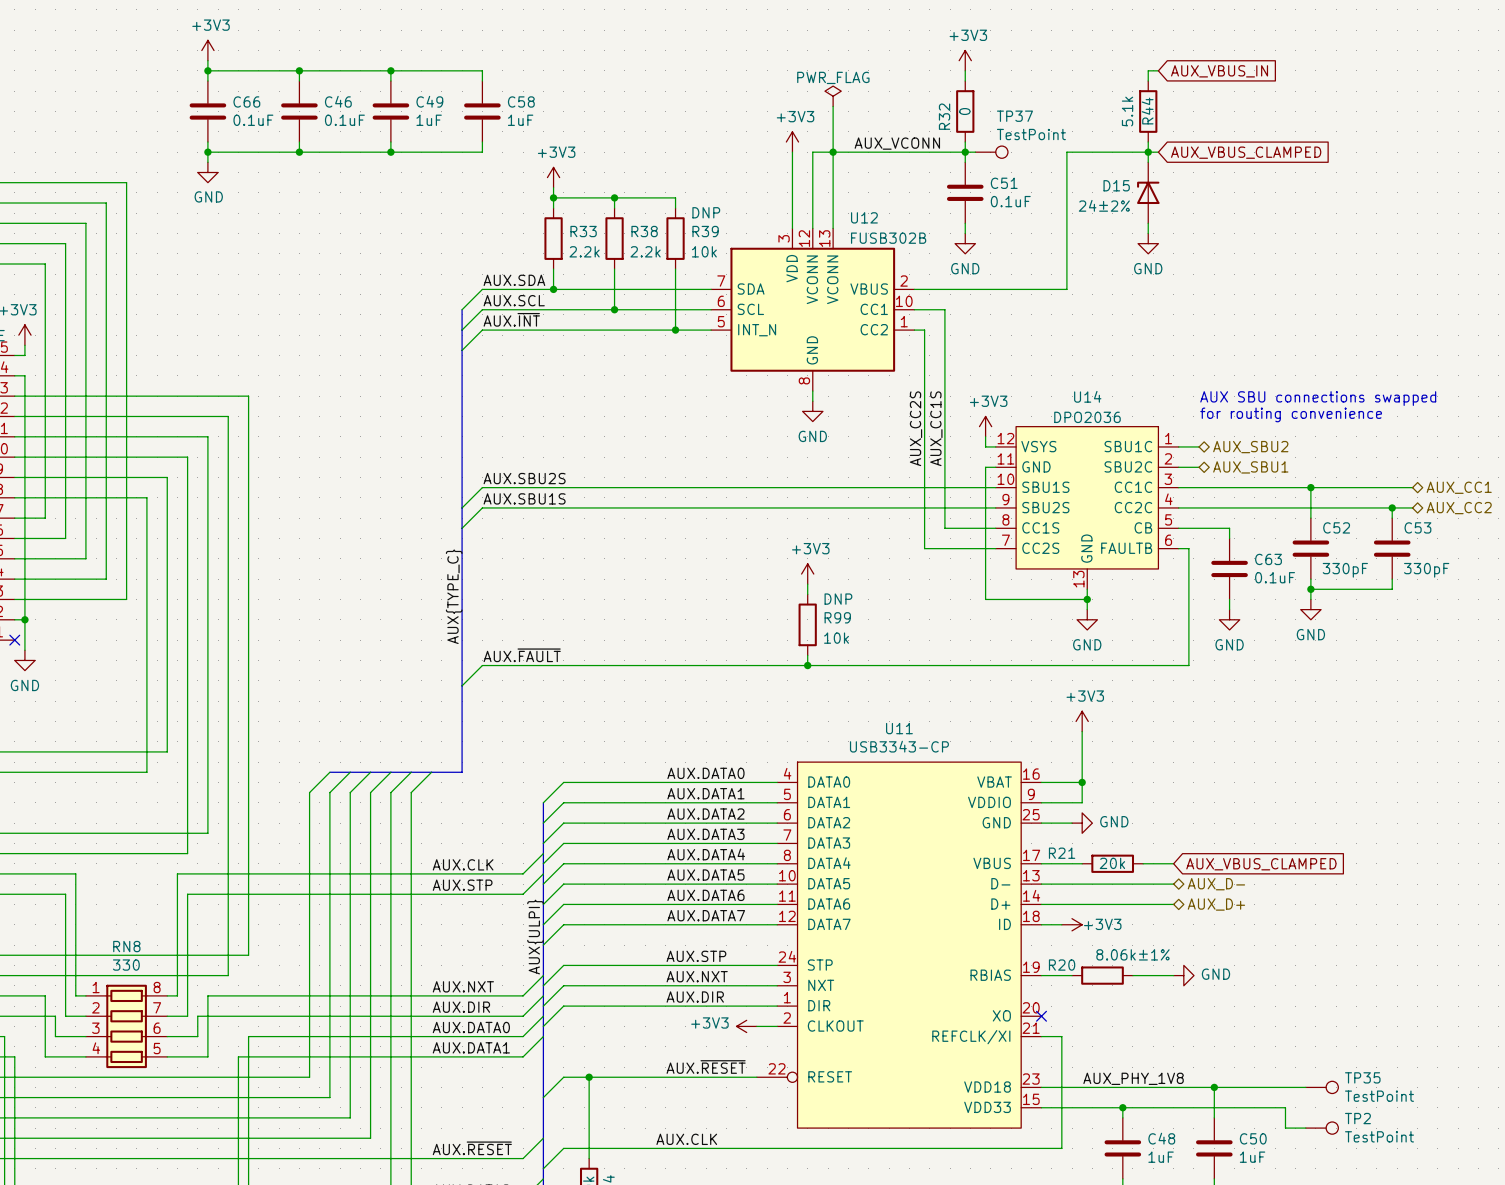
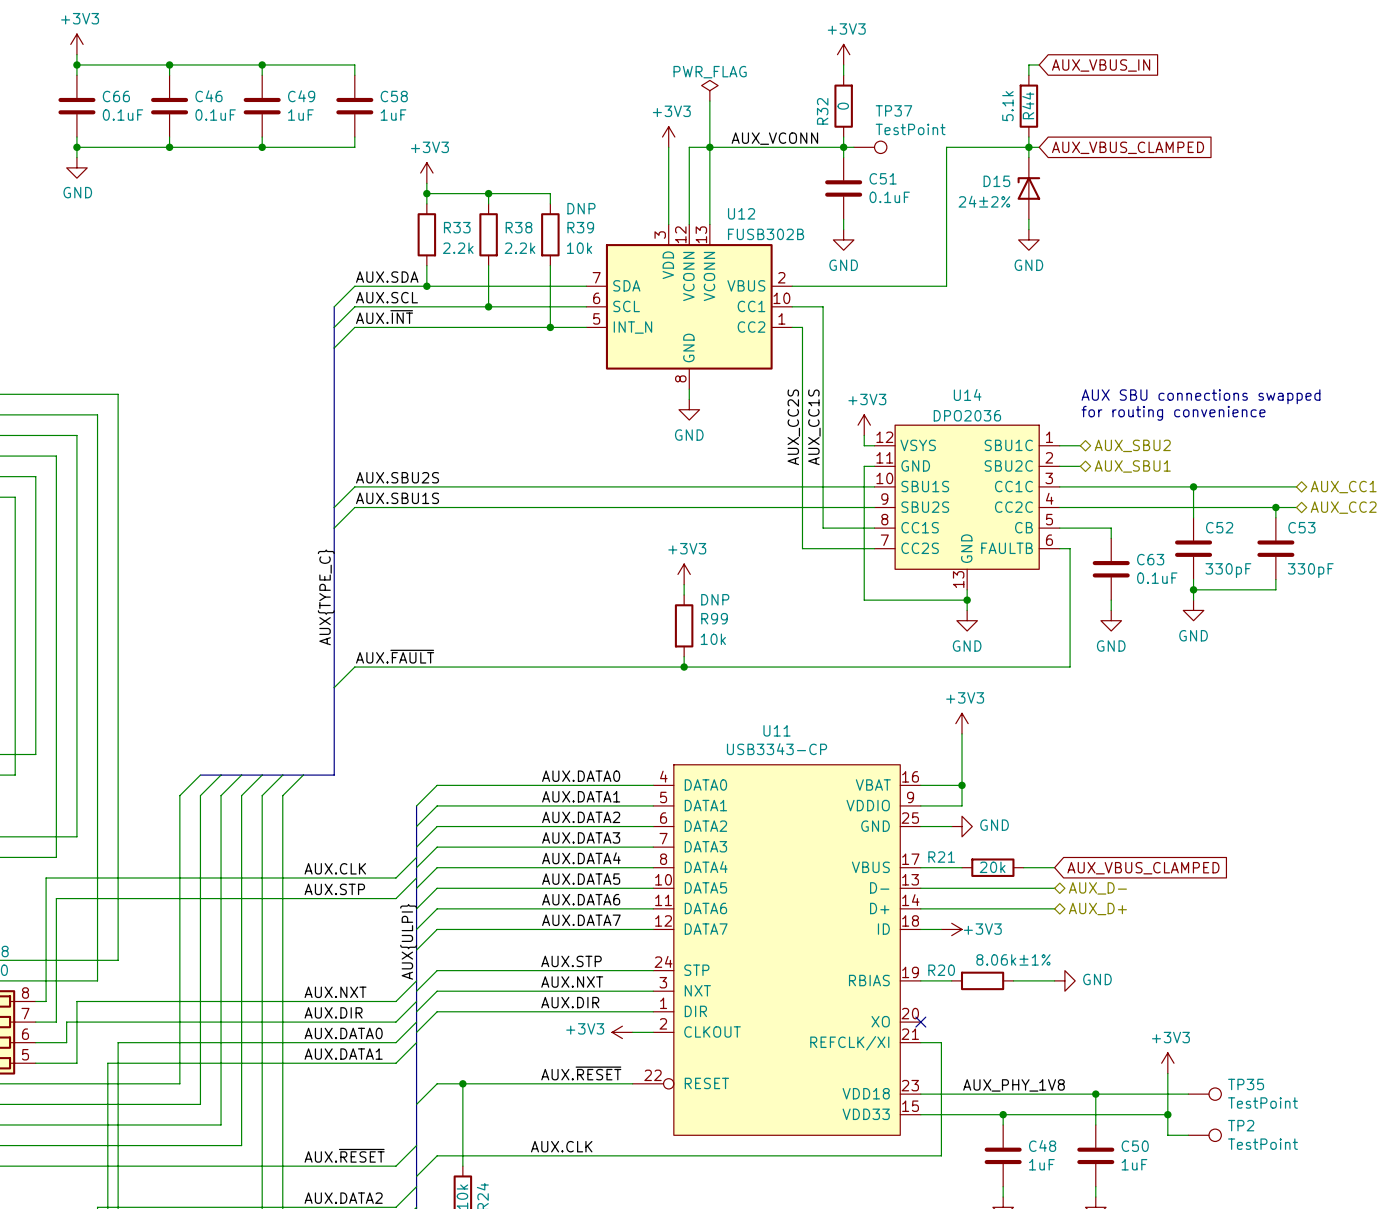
power symbol: none -> +3V3 (1167, 1063)
wire: none -> (1167, 1073) (1167, 1114)
junction: none -> (1167, 1114)

